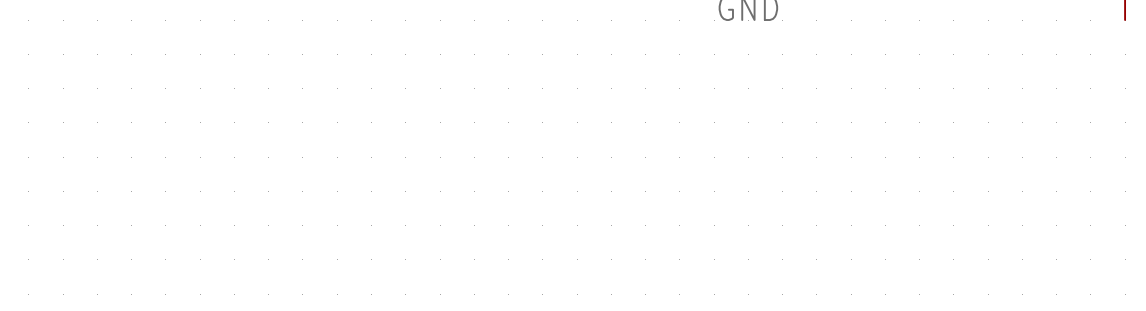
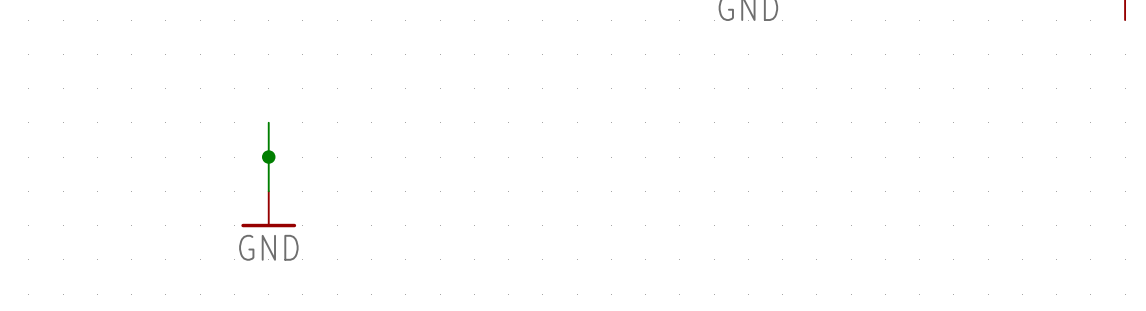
wire: none -> (268, 122) (268, 191)
junction: none -> (268, 157)
power symbol: none -> GND (268, 209)

